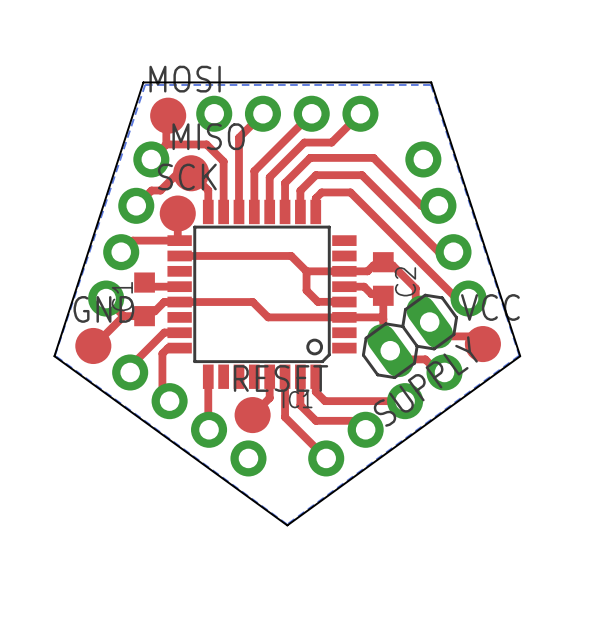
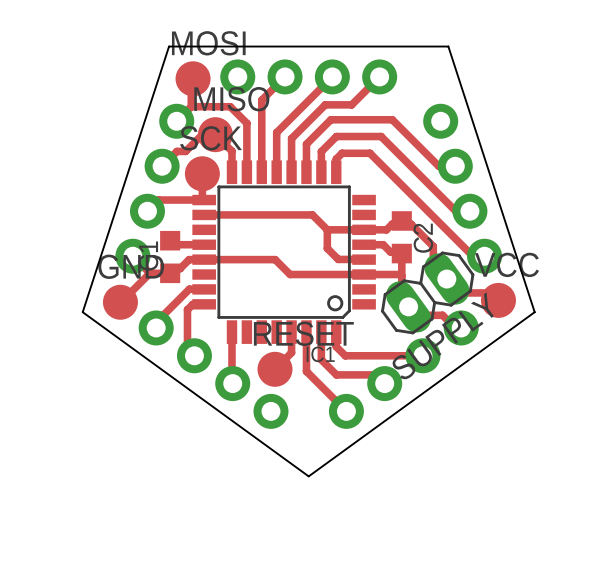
bottom zone outline: (145, 84) (431, 84) (519, 355) (287, 524) (54, 355) (145, 84) -> none

